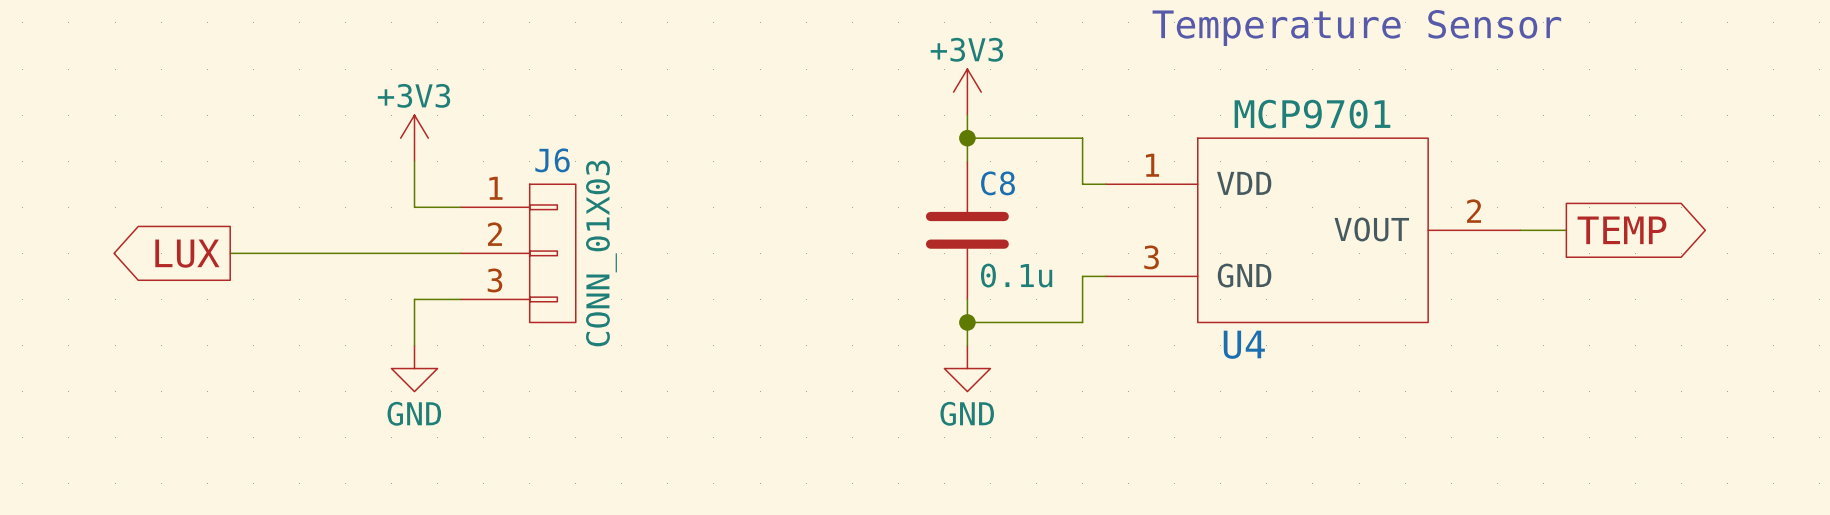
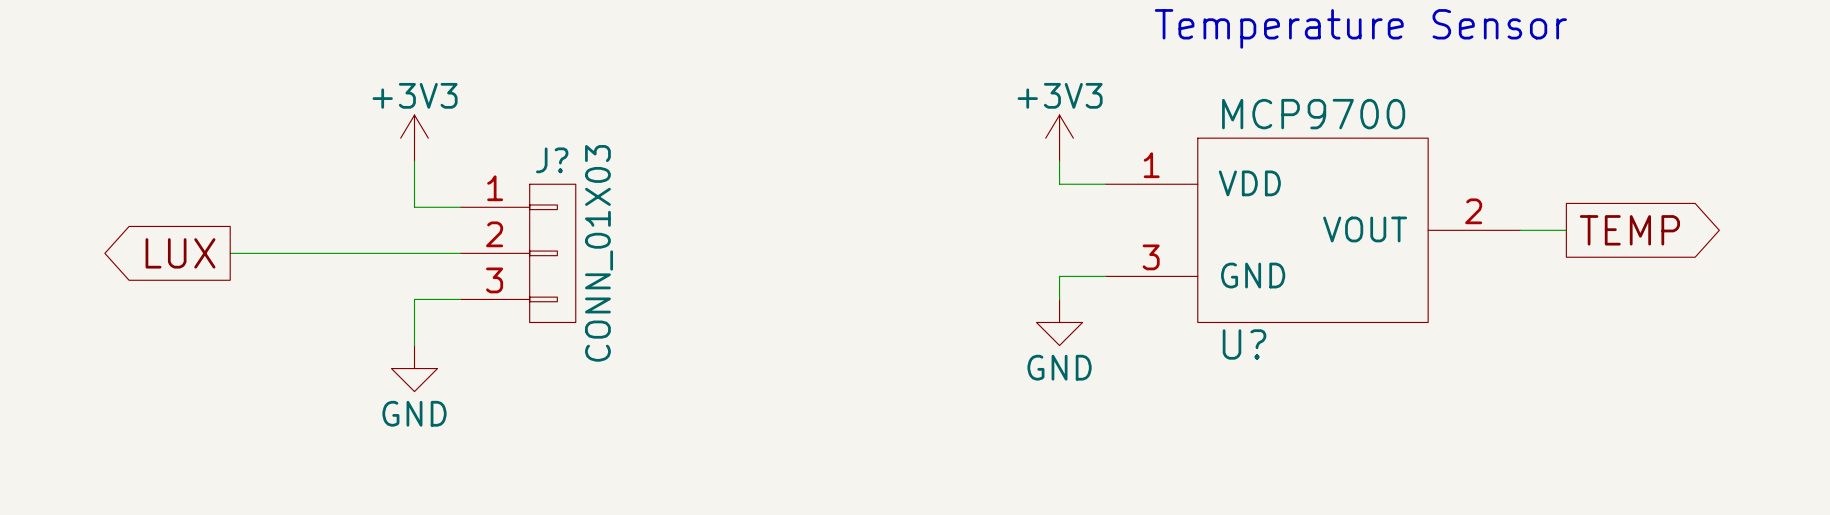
power symbol position: +3V3 (967, 92) -> +3V3 (1059, 138)
U4 value: MCP9701 (1312, 114) -> MCP9700 (1313, 114)
wire: (967, 115) (967, 161) -> none
wire: (967, 138) (1082, 138) (1082, 184) -> (1059, 161) (1059, 184) (1082, 184)
junction: (967, 138) -> none
J6 name: J6 (552, 160) -> J? (552, 160)
C8: 0.1u (967, 230) -> none
wire: (1082, 276) (1082, 322) (967, 322) -> (1082, 276) (1059, 276) (1059, 299)
wire: (967, 299) (967, 345) -> none
junction: (967, 322) -> none
U4 name: U4 (1244, 344) -> U? (1244, 344)
power symbol position: GND (967, 368) -> GND (1059, 322)

